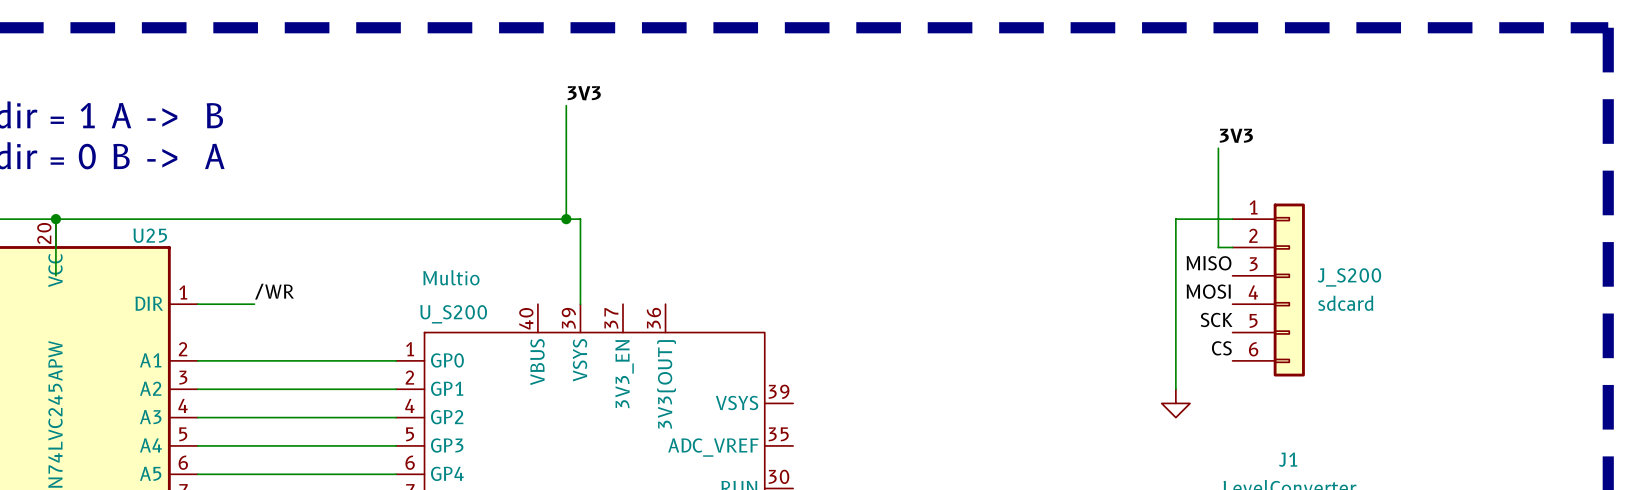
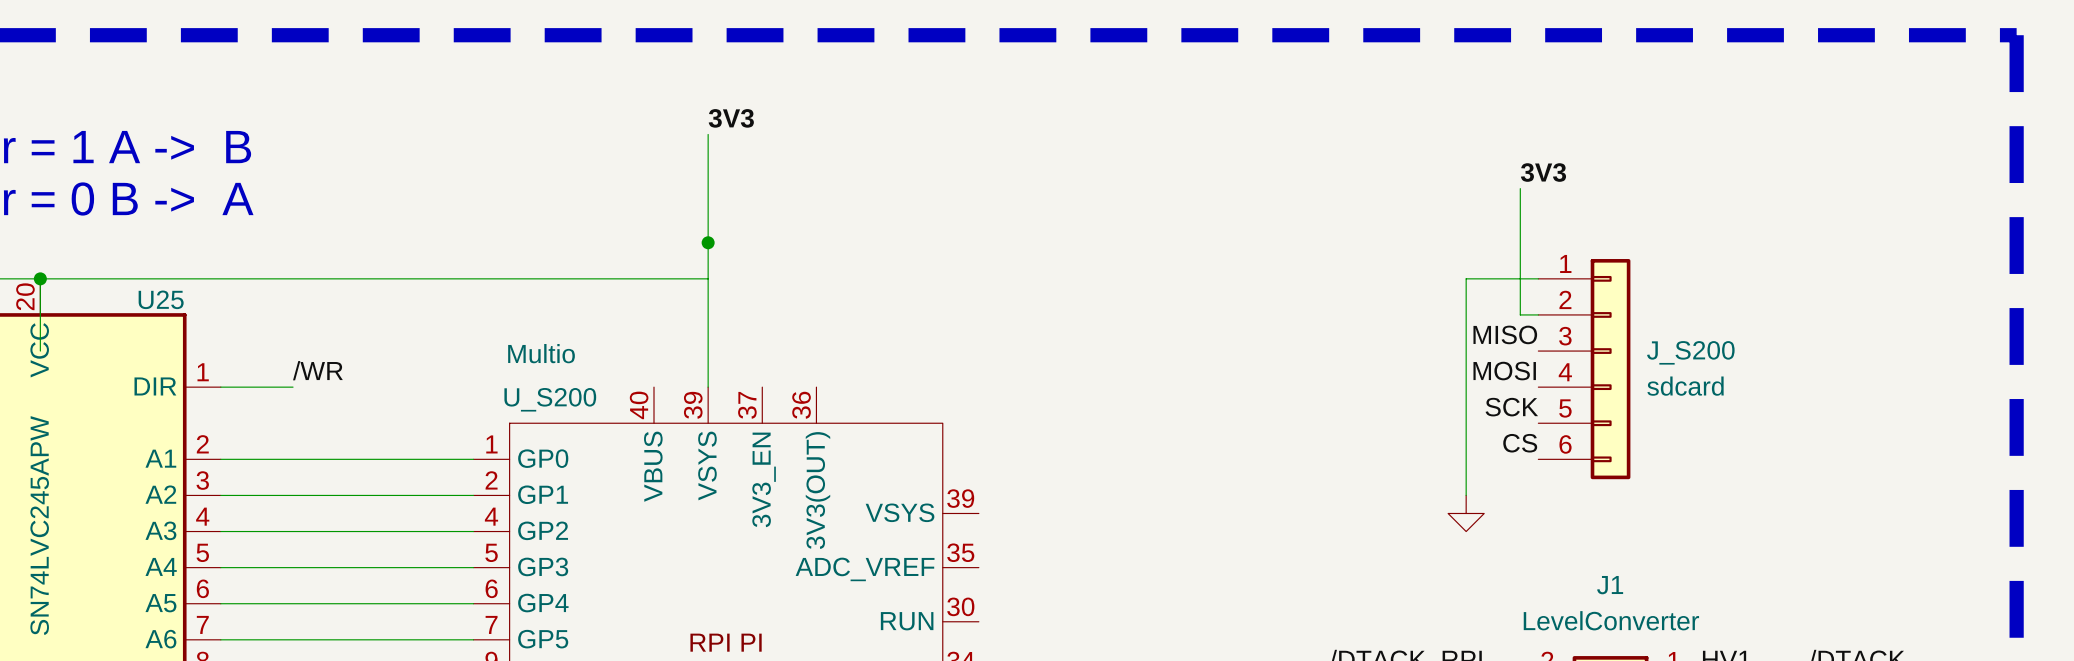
label position: 3V3 (584, 93) -> 3V3 (731, 118)
wire: (566, 105) (566, 219) -> (708, 134) (708, 278)
junction position: (566, 219) -> (708, 242)

